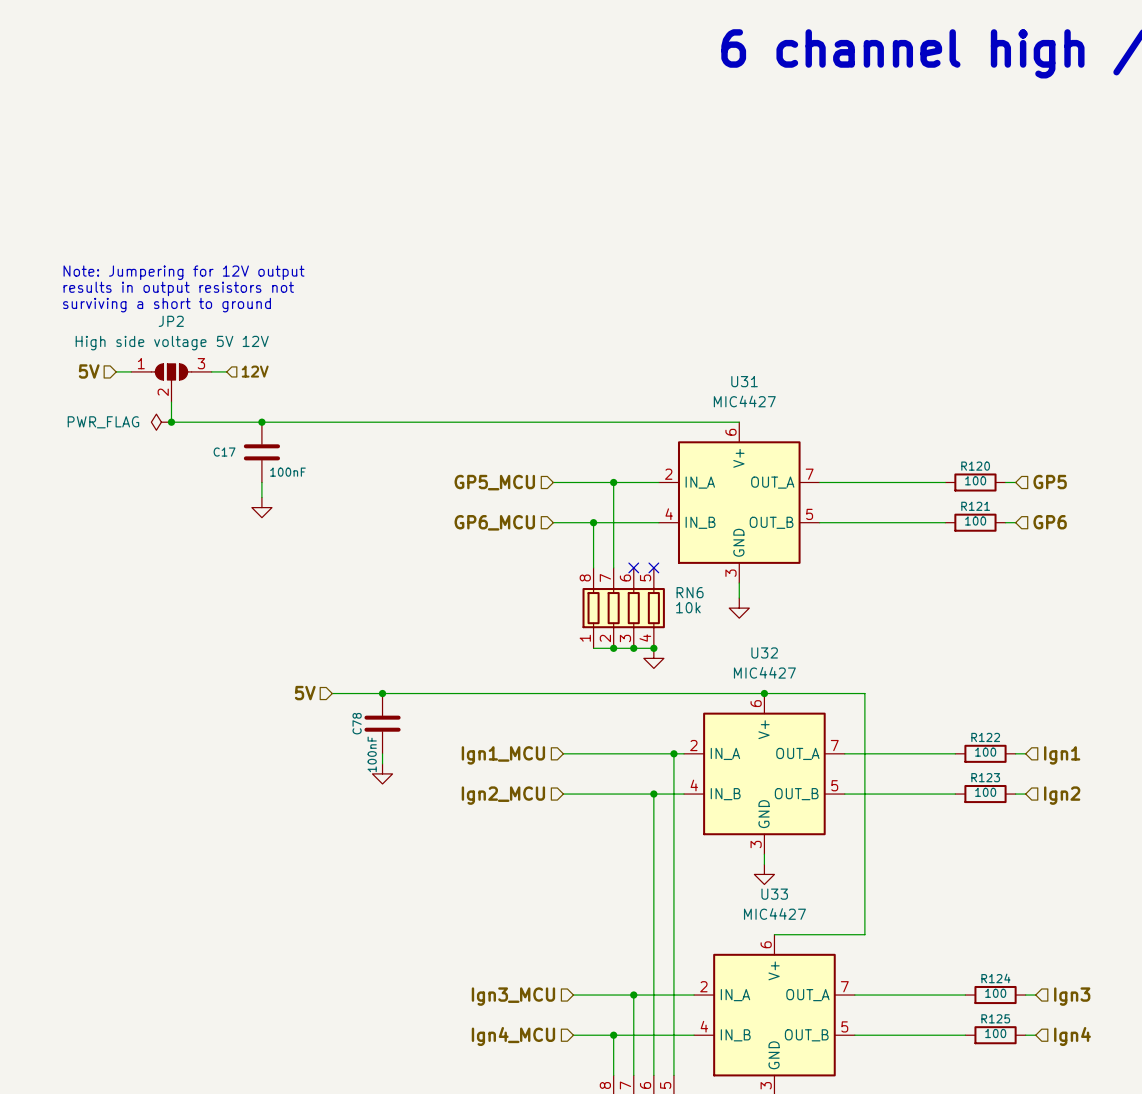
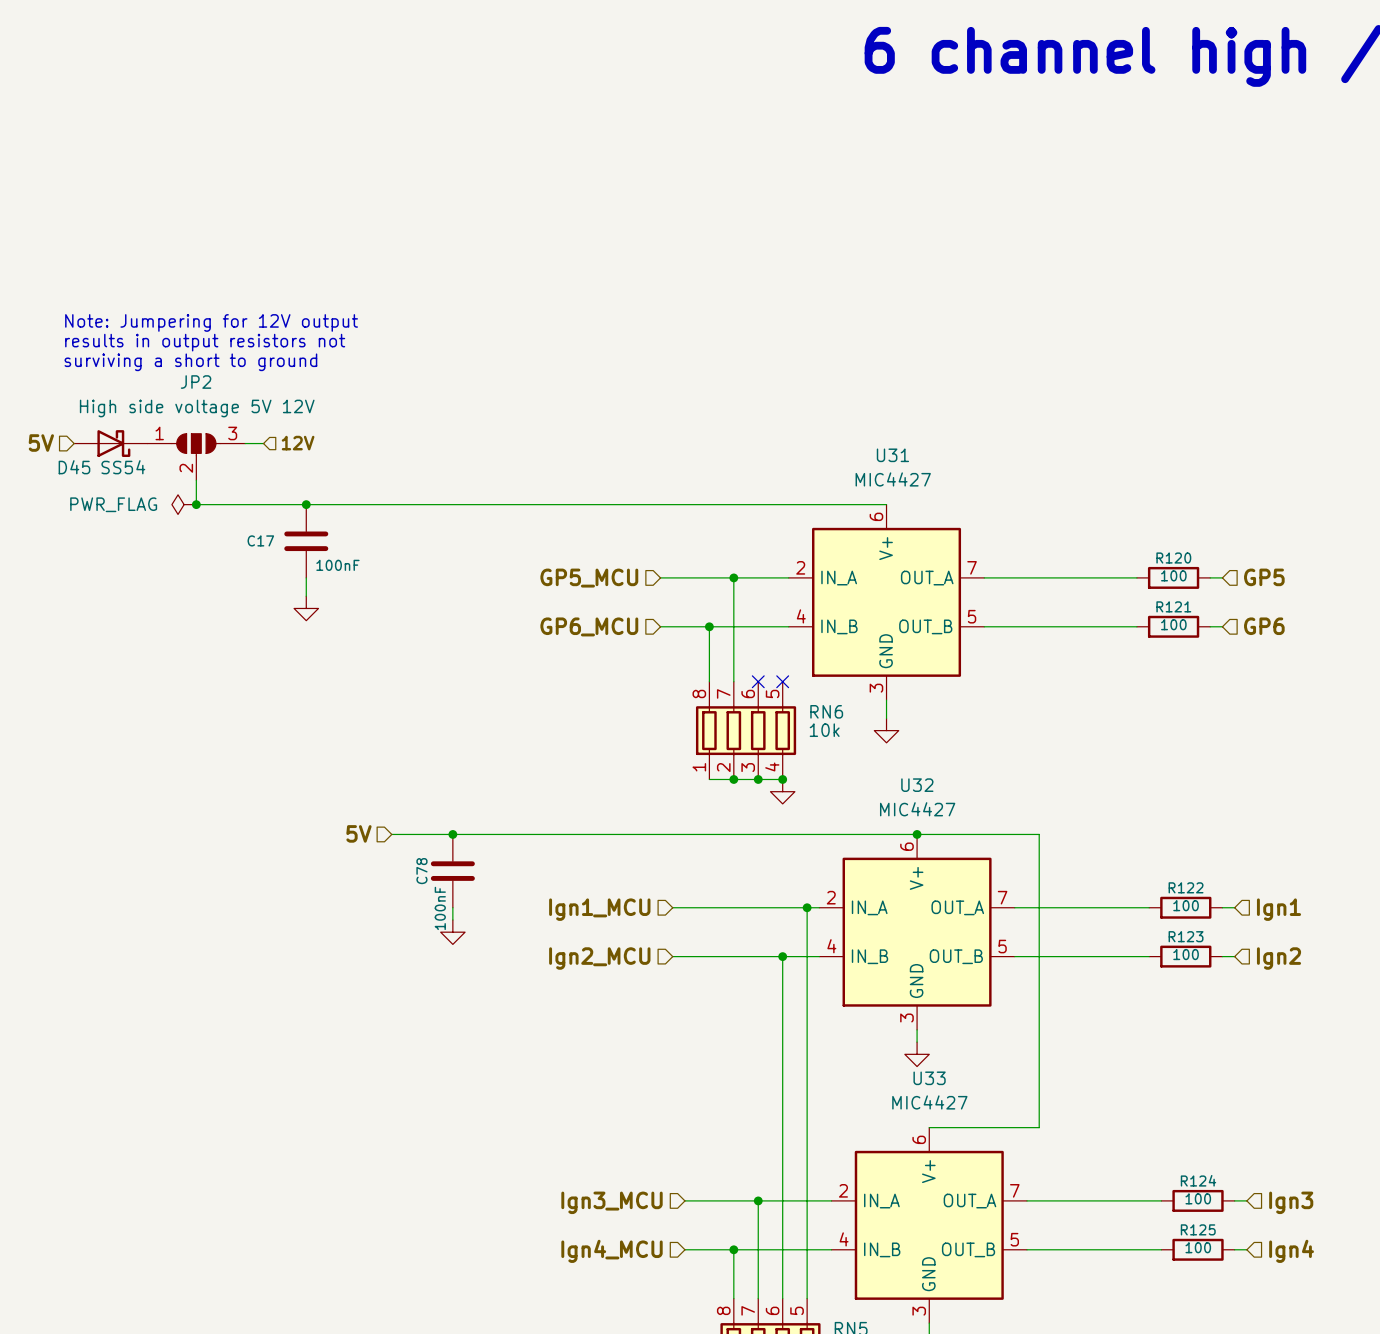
hierarchical label position: 5V (89, 371) -> 5V (41, 443)
D45: none -> SS54 (110, 443)

